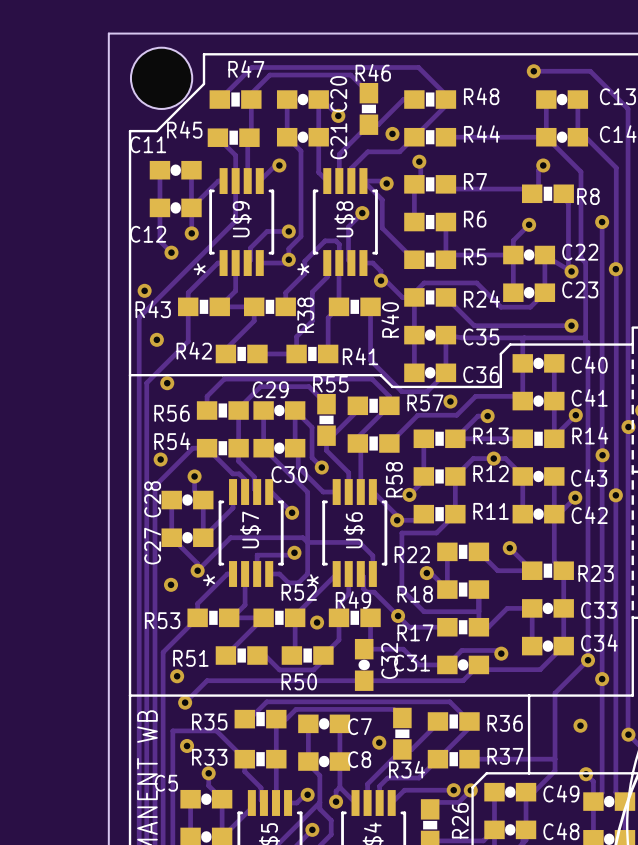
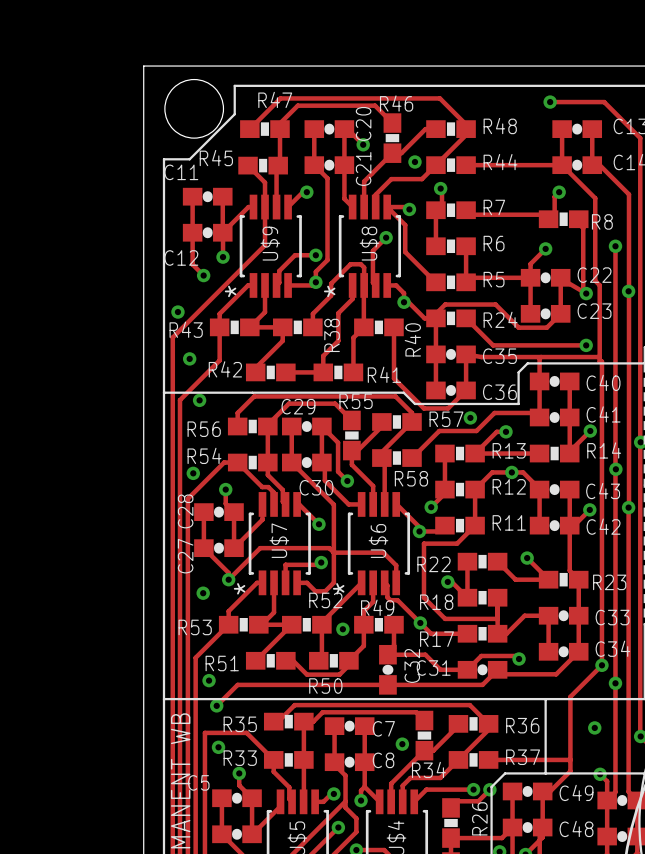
R58 name rotation: 0° (394, 479) -> 90° clockwise (411, 478)

